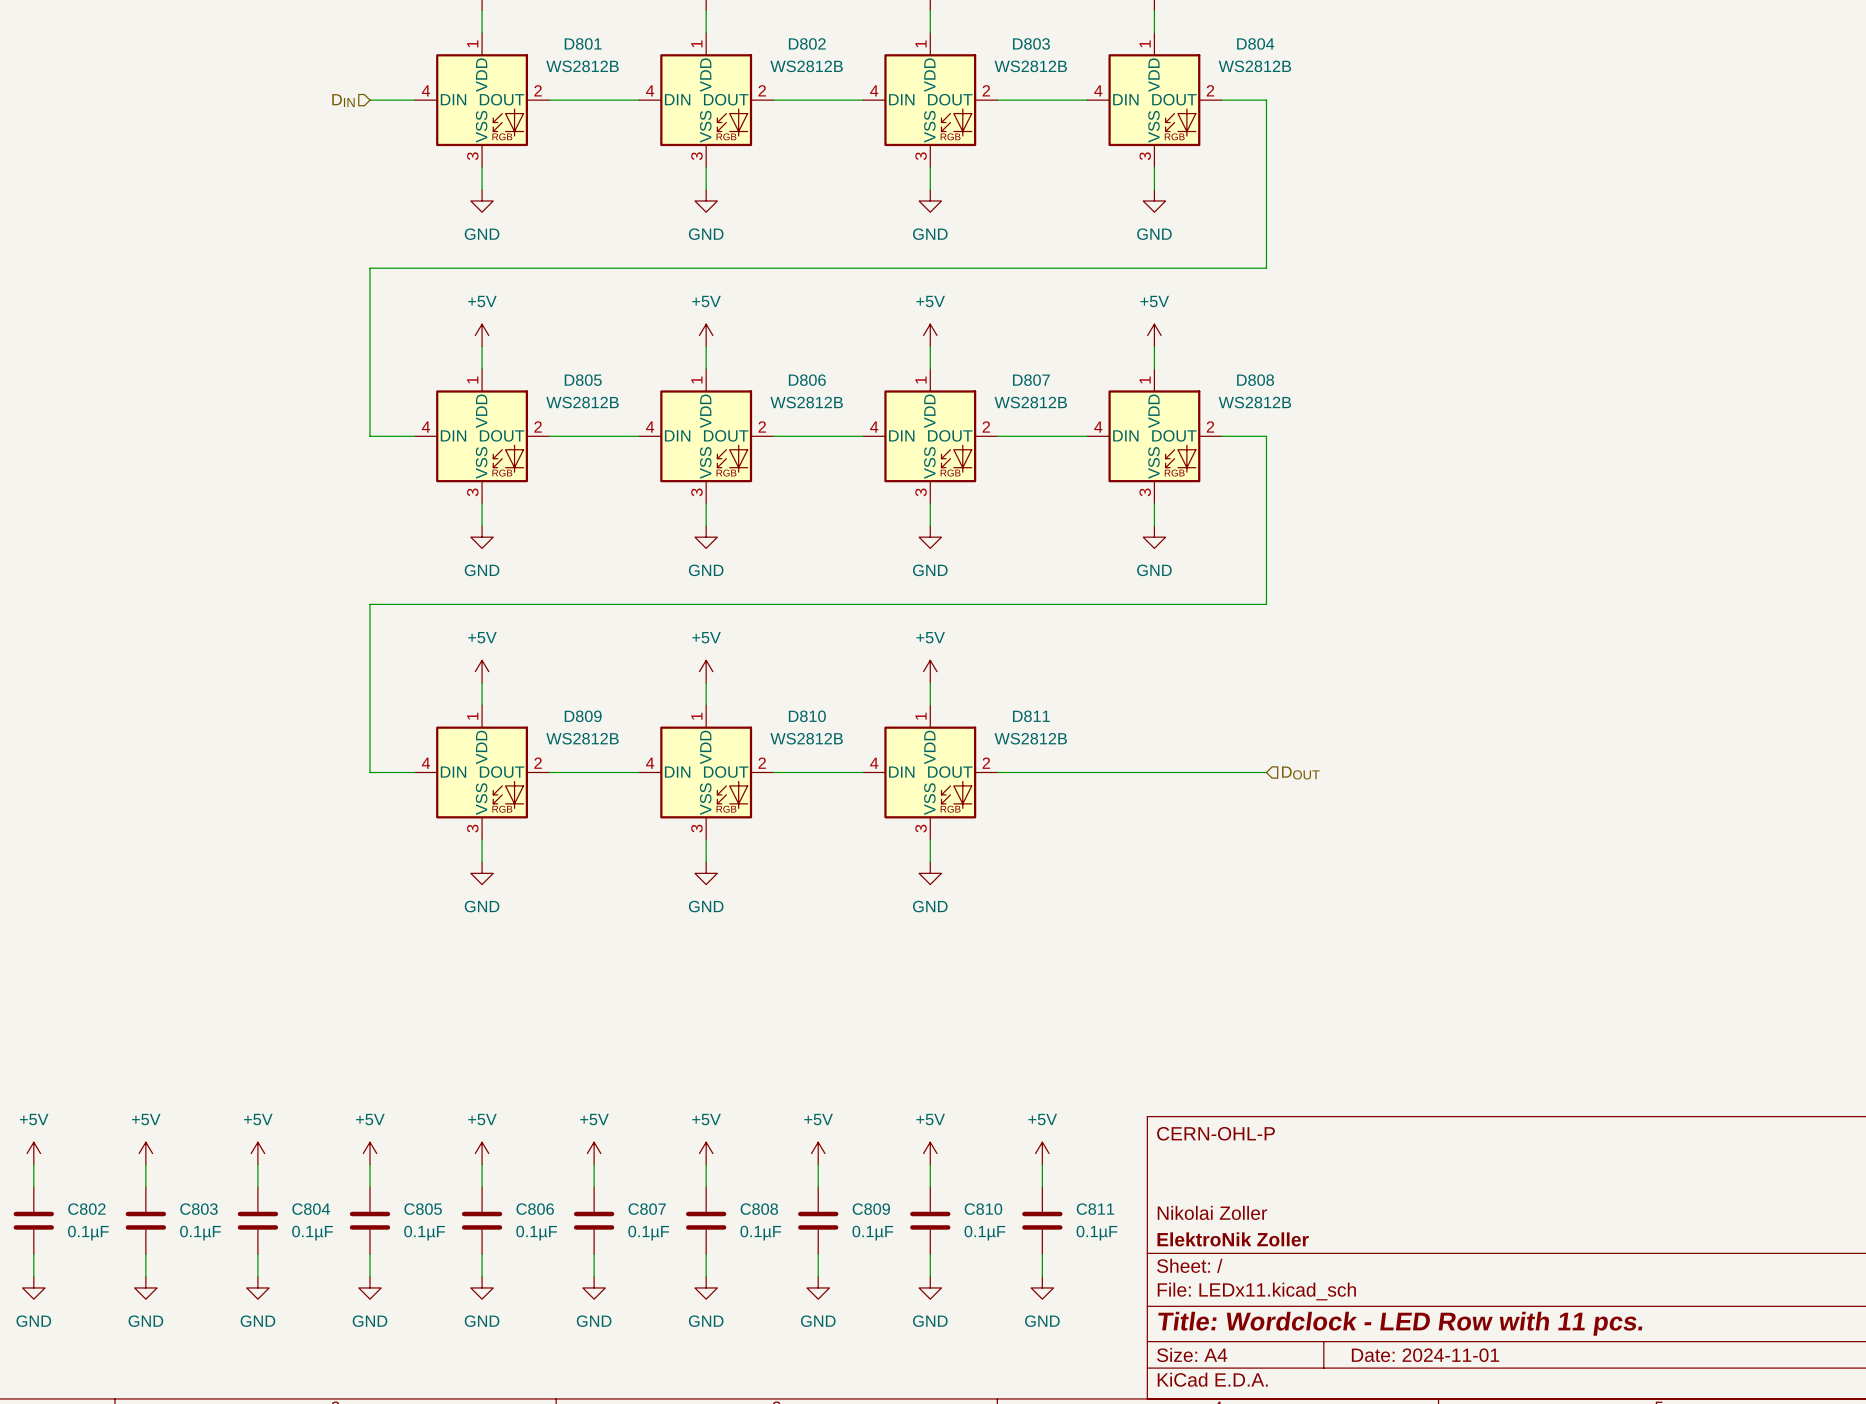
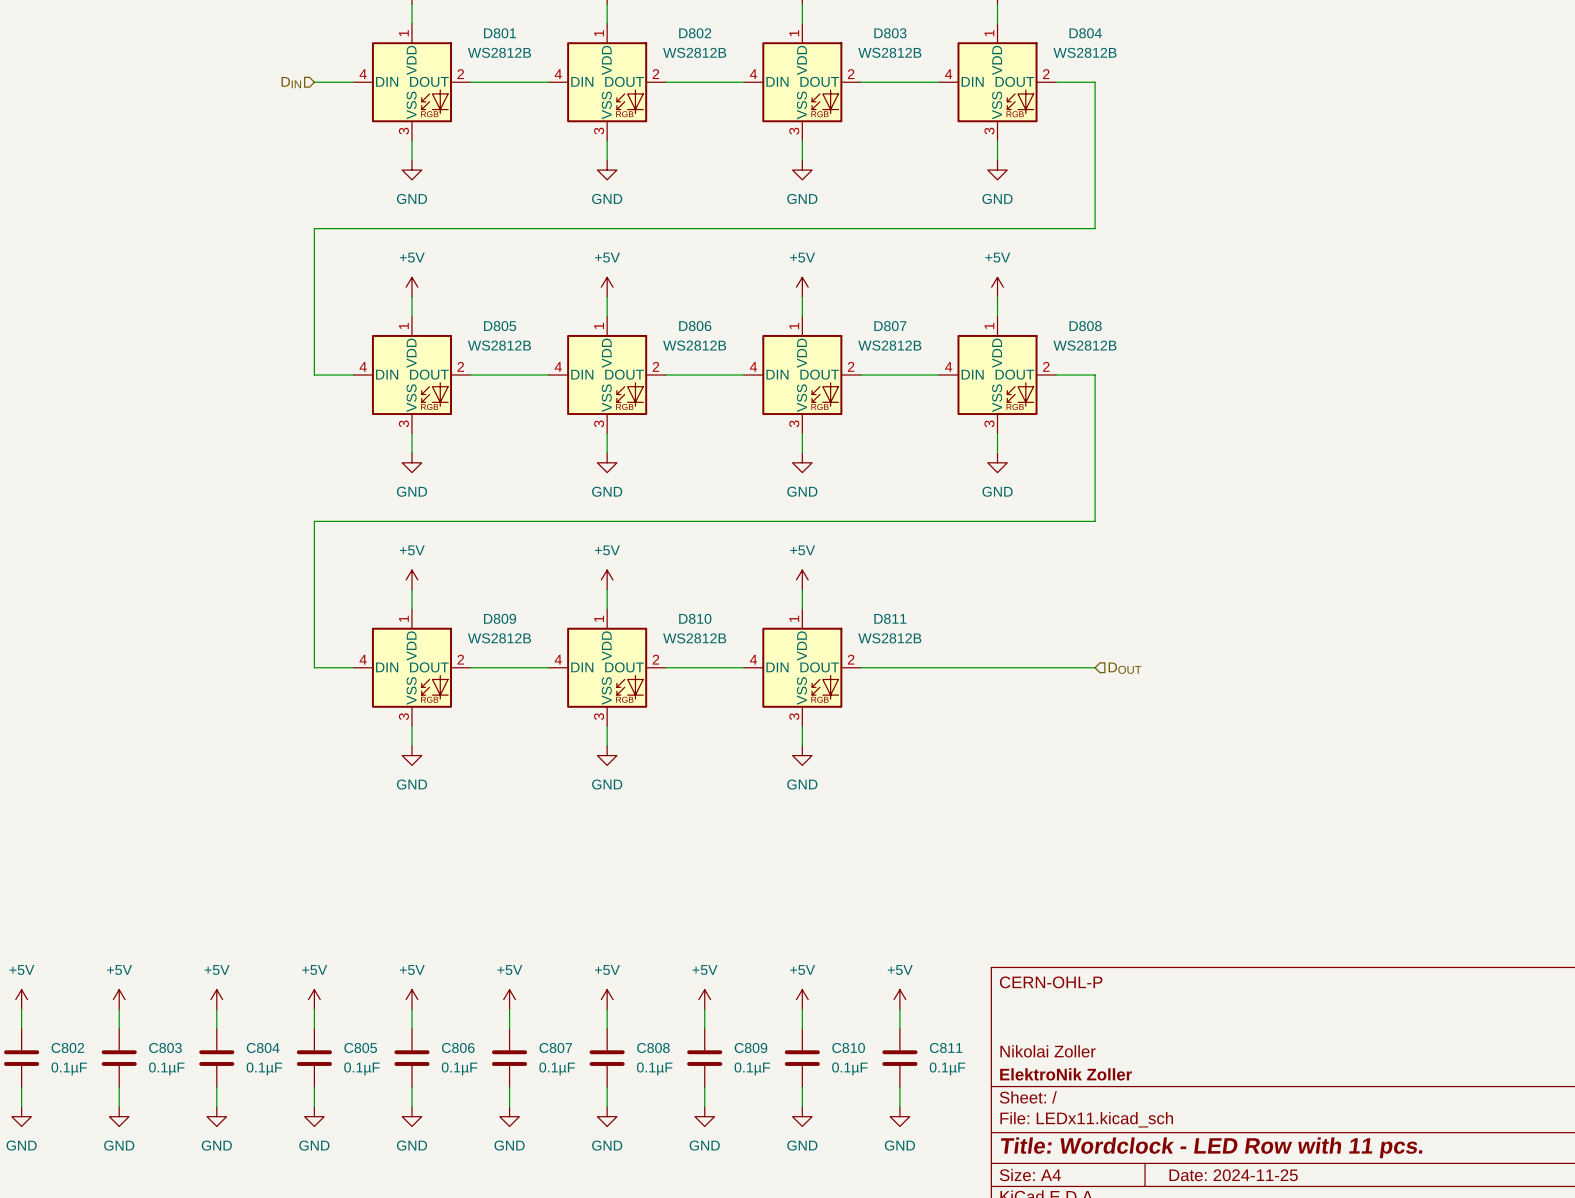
title block: Date: 2024-11-01 (1425, 1355) -> Date: 2024-11-25 (1233, 1175)

